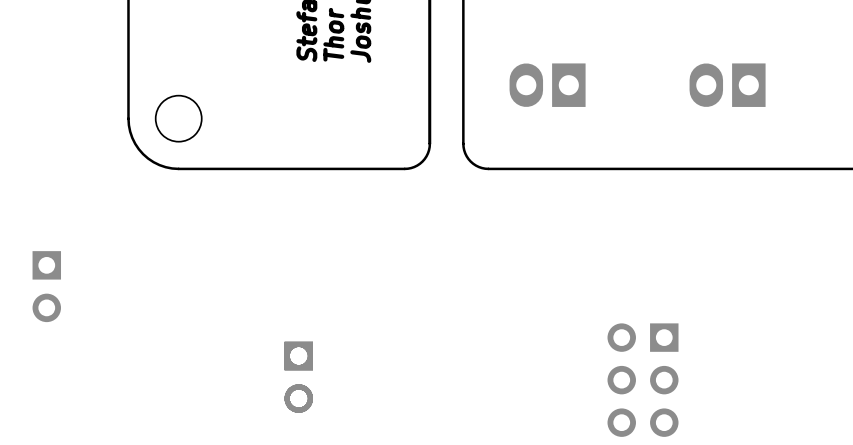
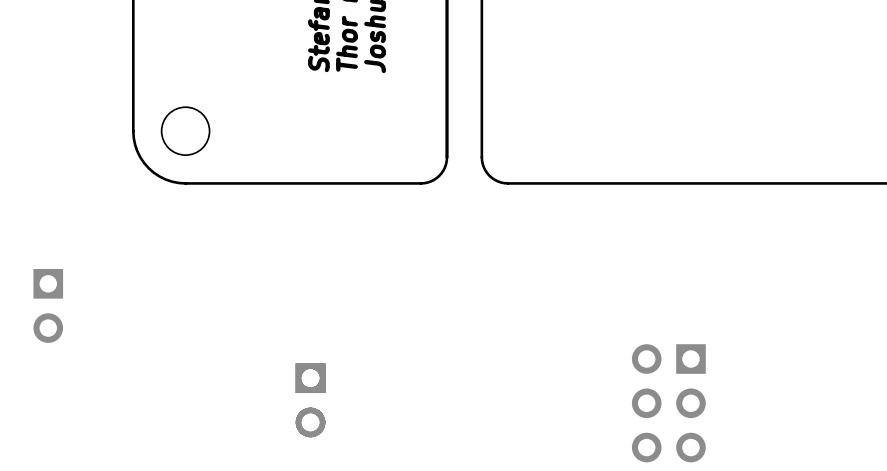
part: (547, 85) -> none
part: (727, 85) -> none

